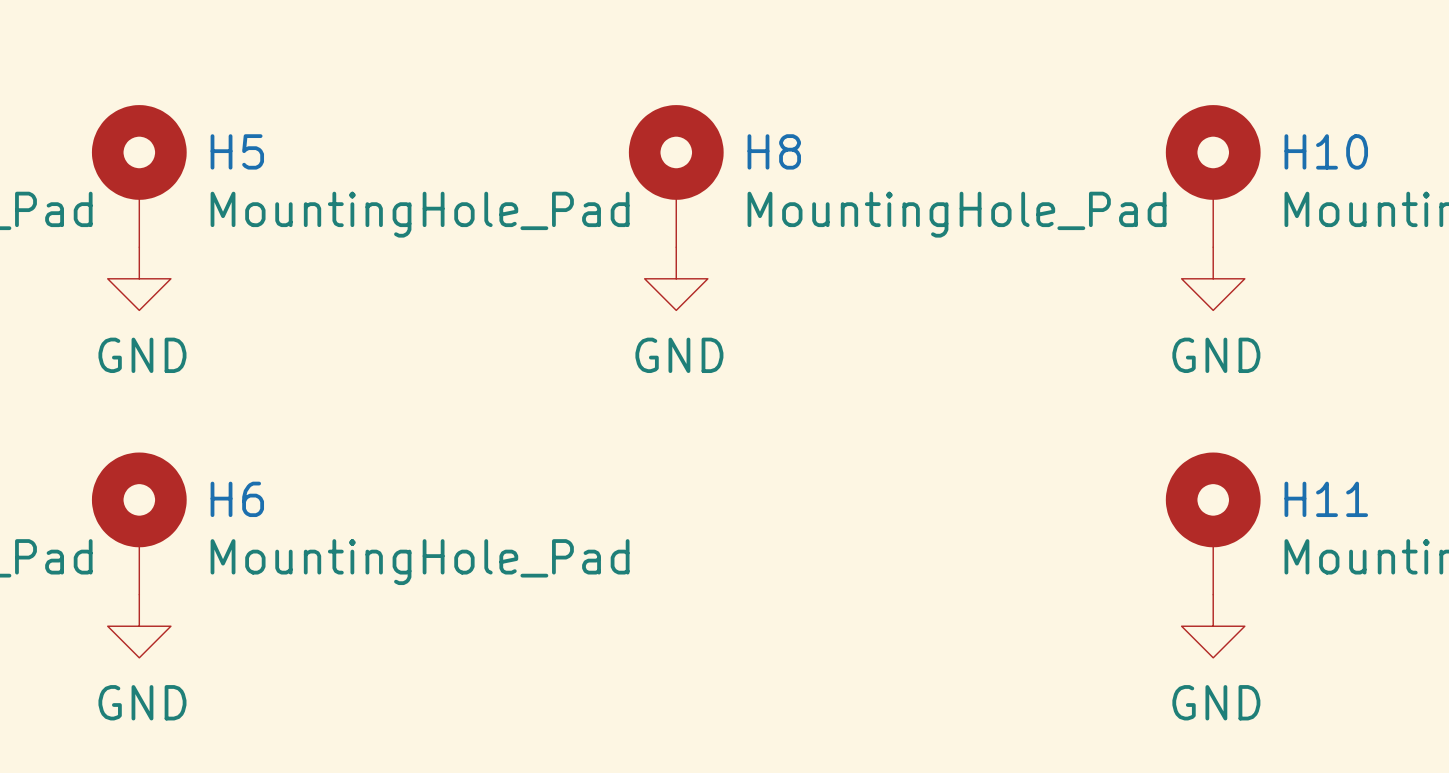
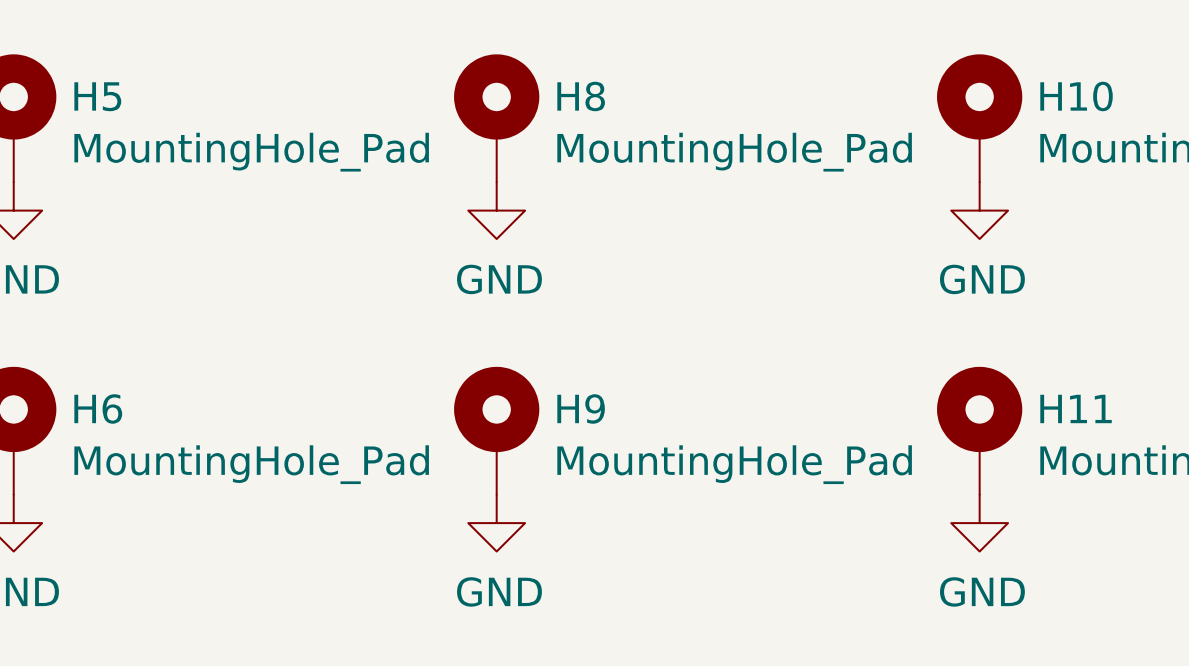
H9: none -> MountingHole_Pad (496, 430)
power symbol: none -> GND (496, 523)

